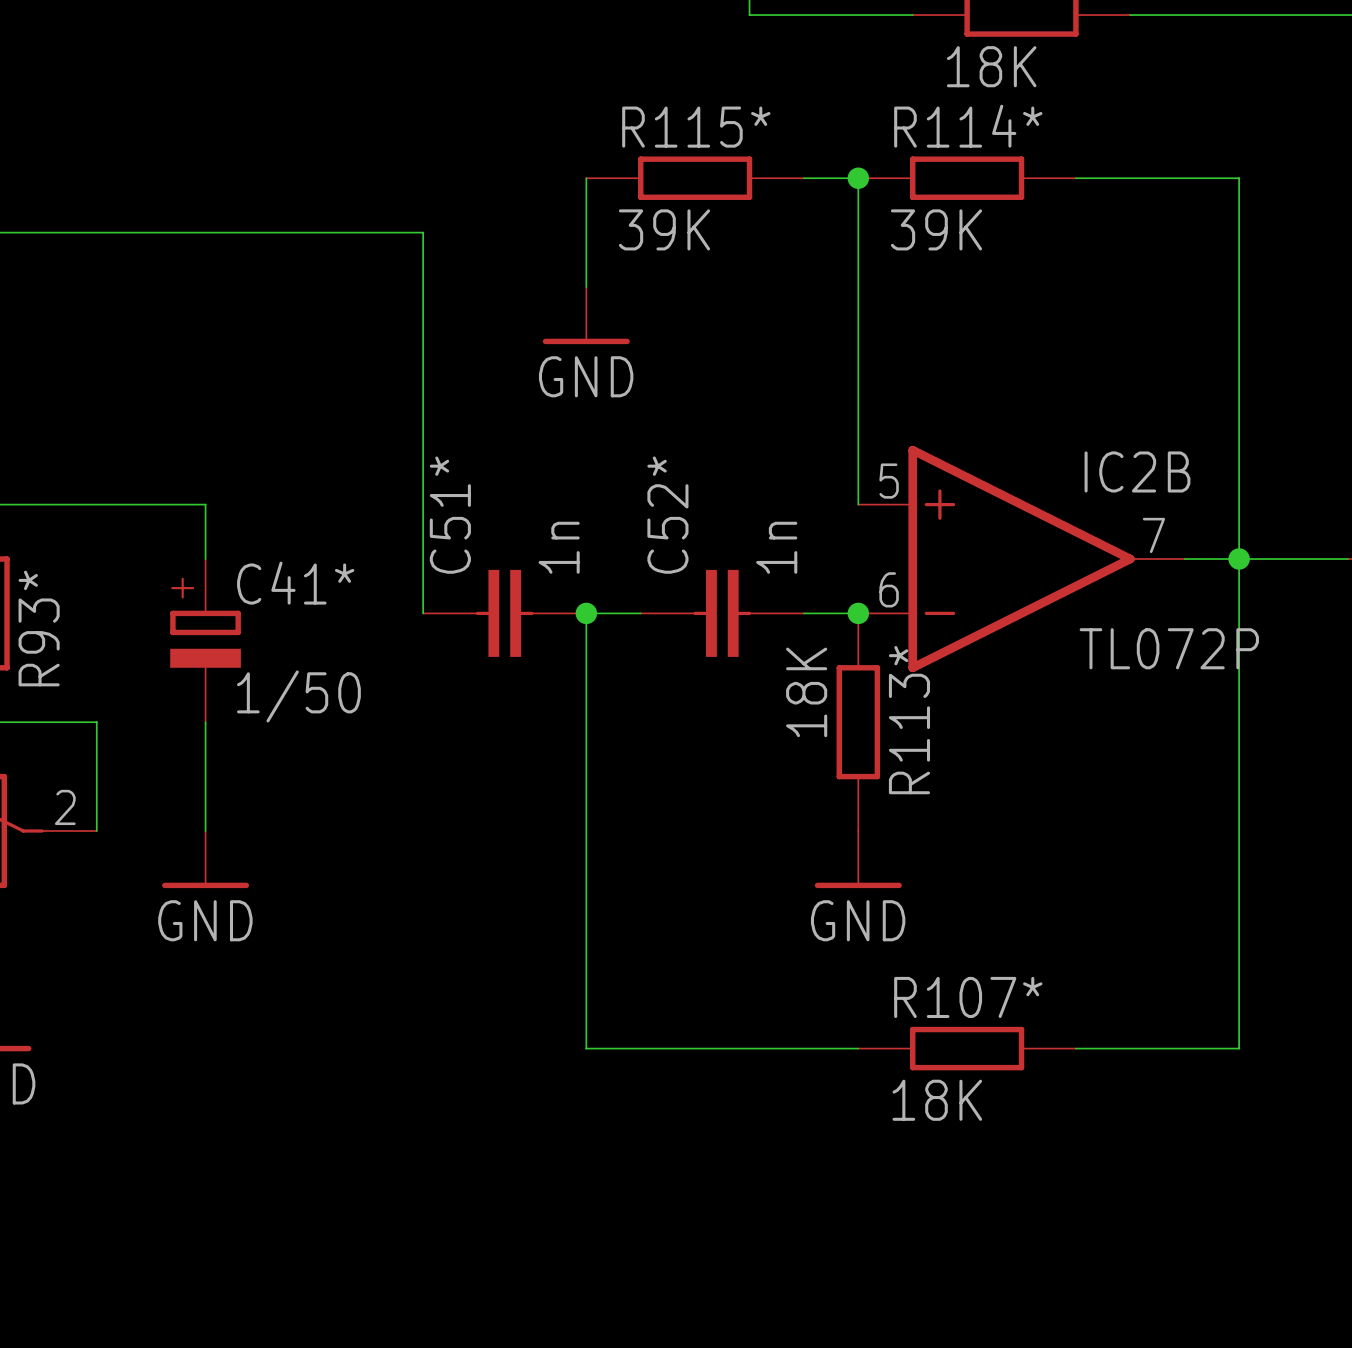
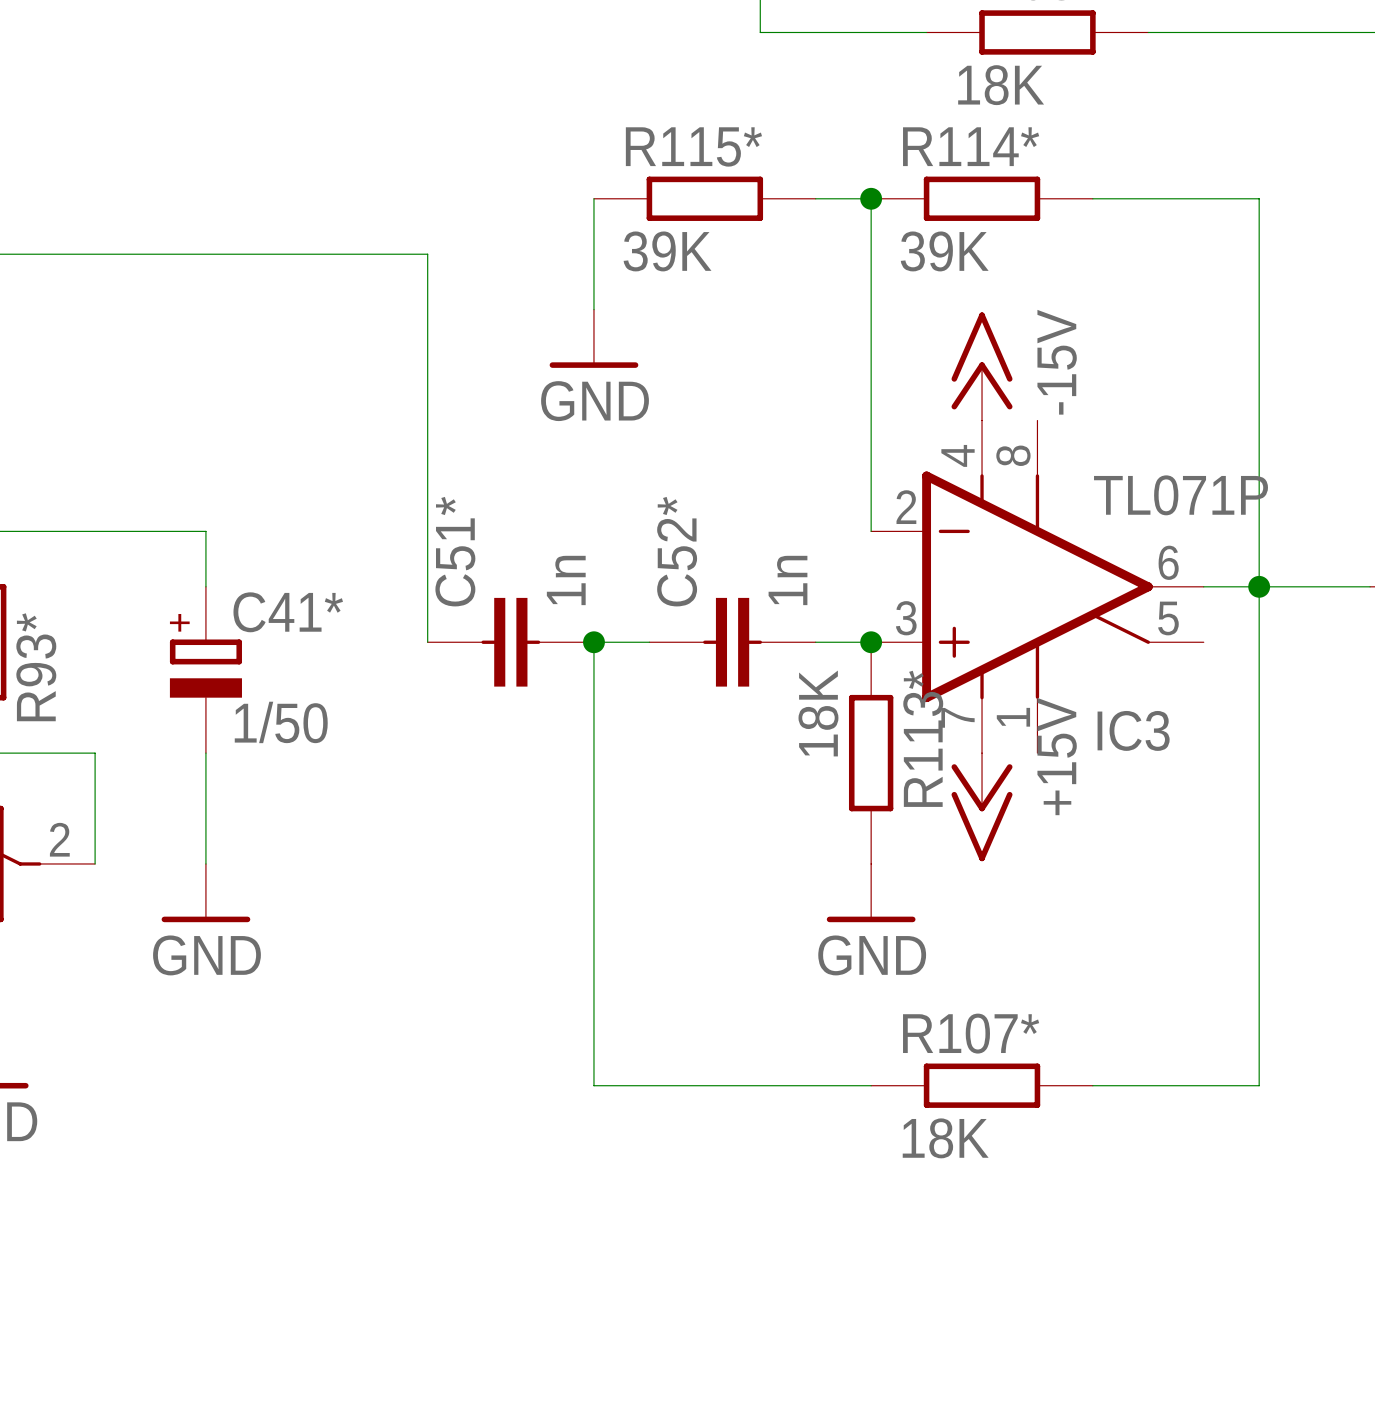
power symbol: none -> -15V (982, 366)
IC2B: TL072P (1021, 559) -> none
IC3: none -> TL071P (1037, 586)
power symbol: none -> +15V (982, 807)

